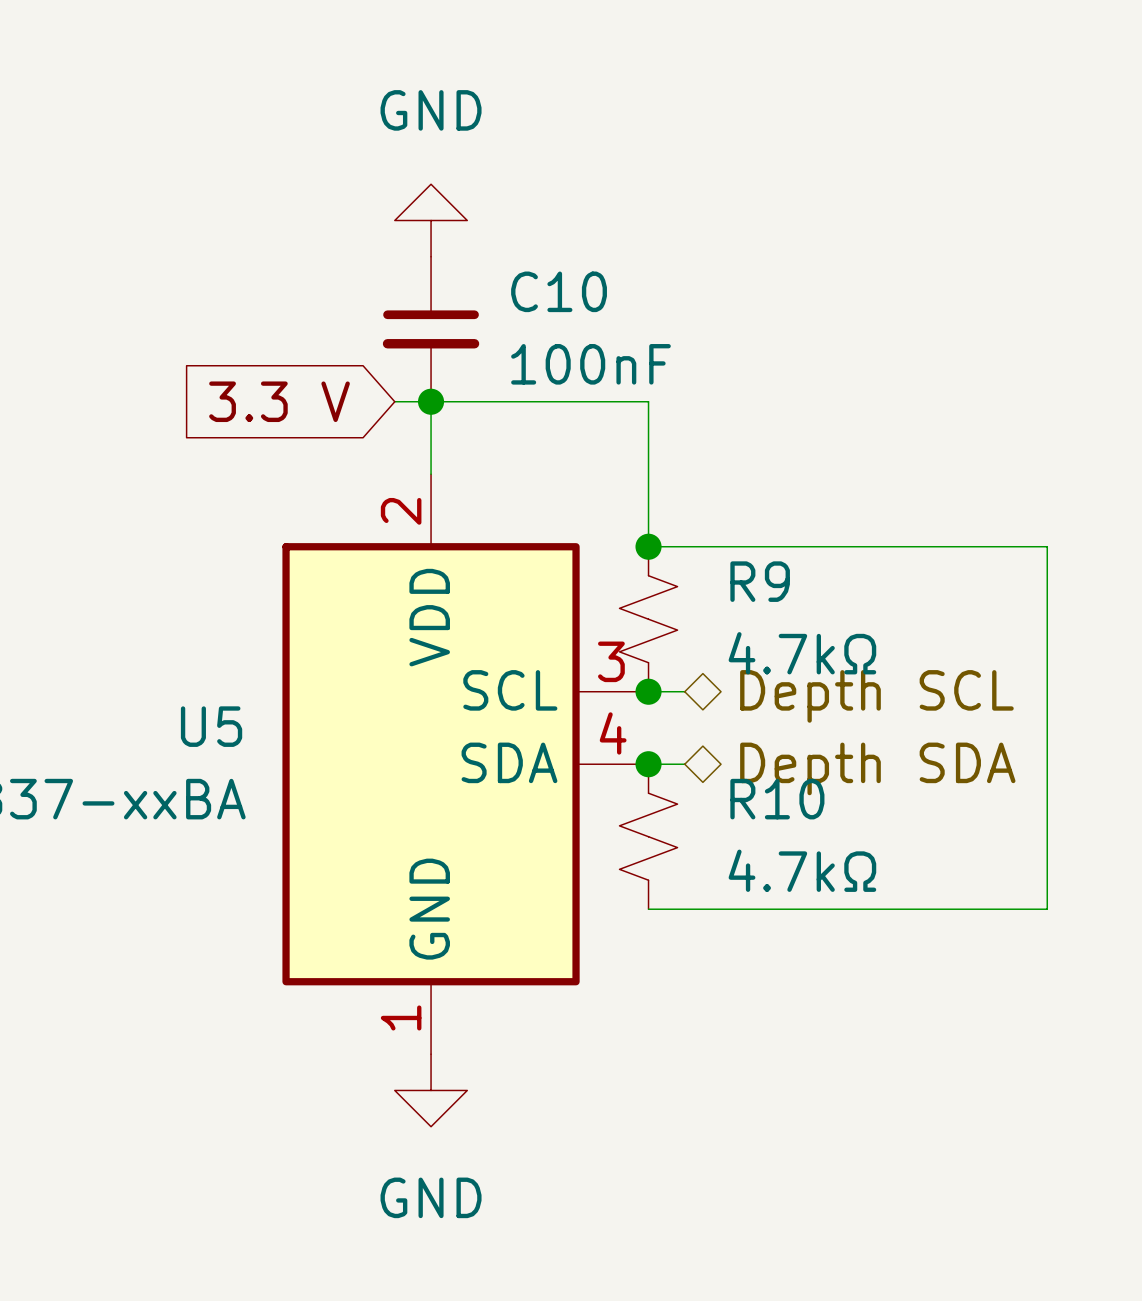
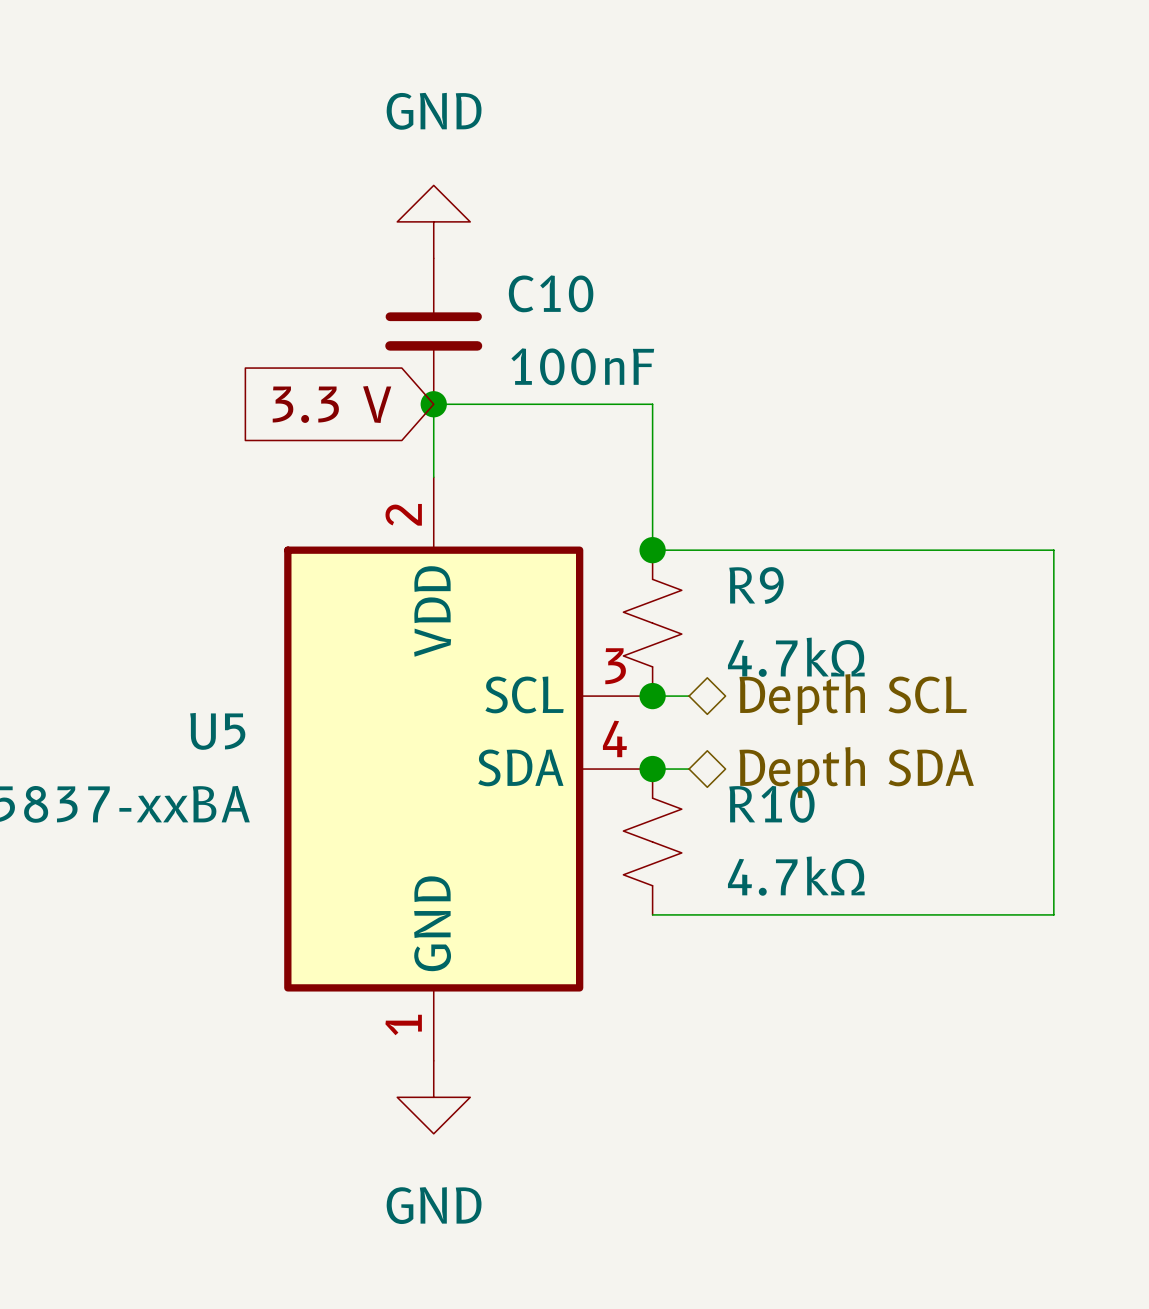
global label position: 3.3 V (279, 401) -> 3.3 V (331, 404)
wire: (394, 401) (431, 401) -> none

